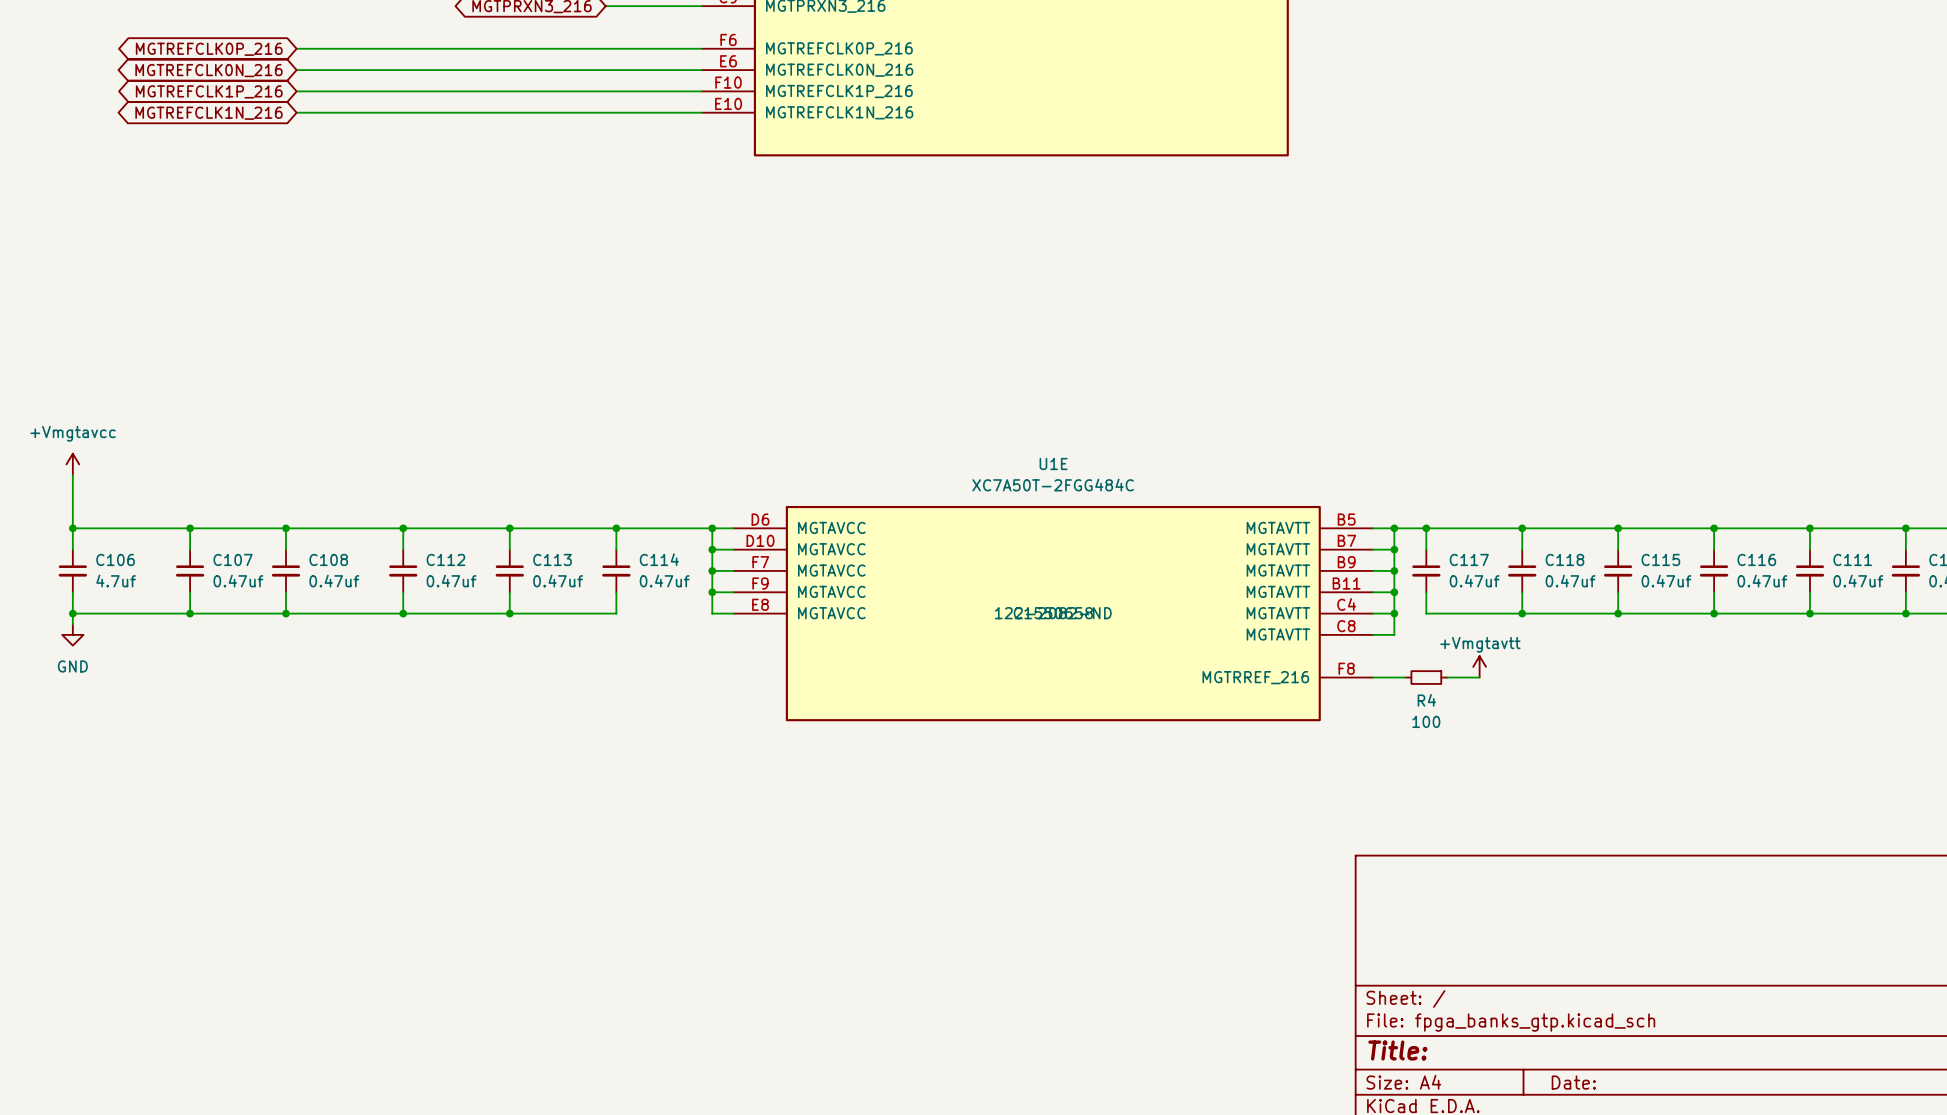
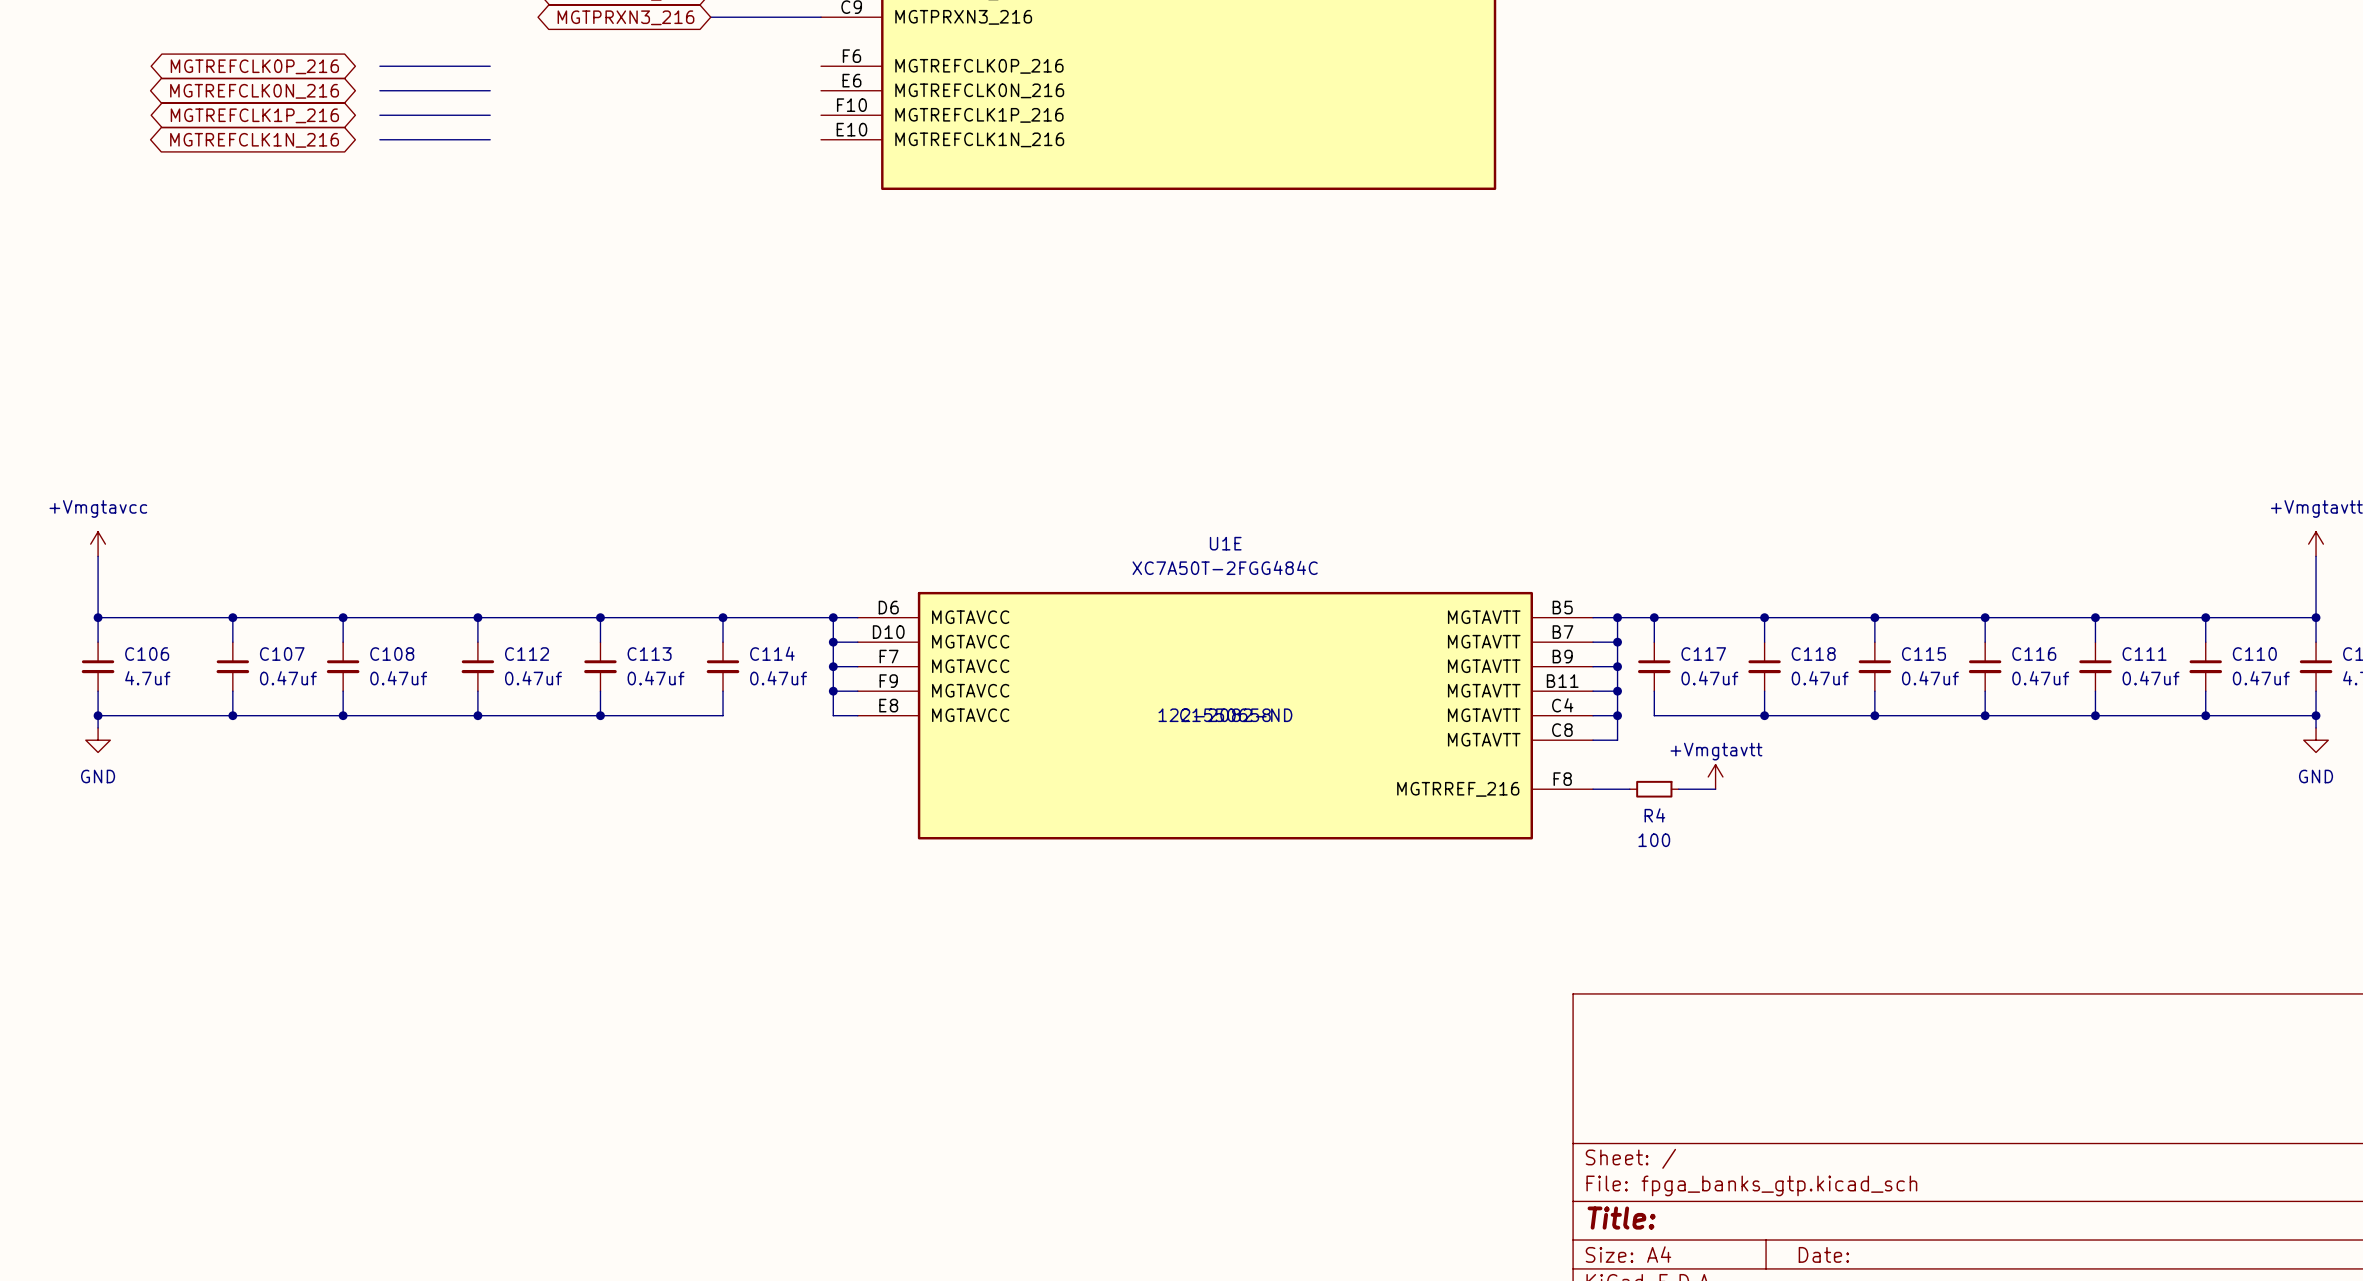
wire: (296, 48) (317, 48) -> none
wire: (413, 48) (701, 48) -> none
wire: (296, 70) (317, 70) -> none
wire: (413, 70) (701, 70) -> none
wire: (296, 91) (317, 91) -> none
wire: (413, 91) (701, 91) -> none
wire: (296, 112) (317, 112) -> none
wire: (413, 112) (701, 112) -> none

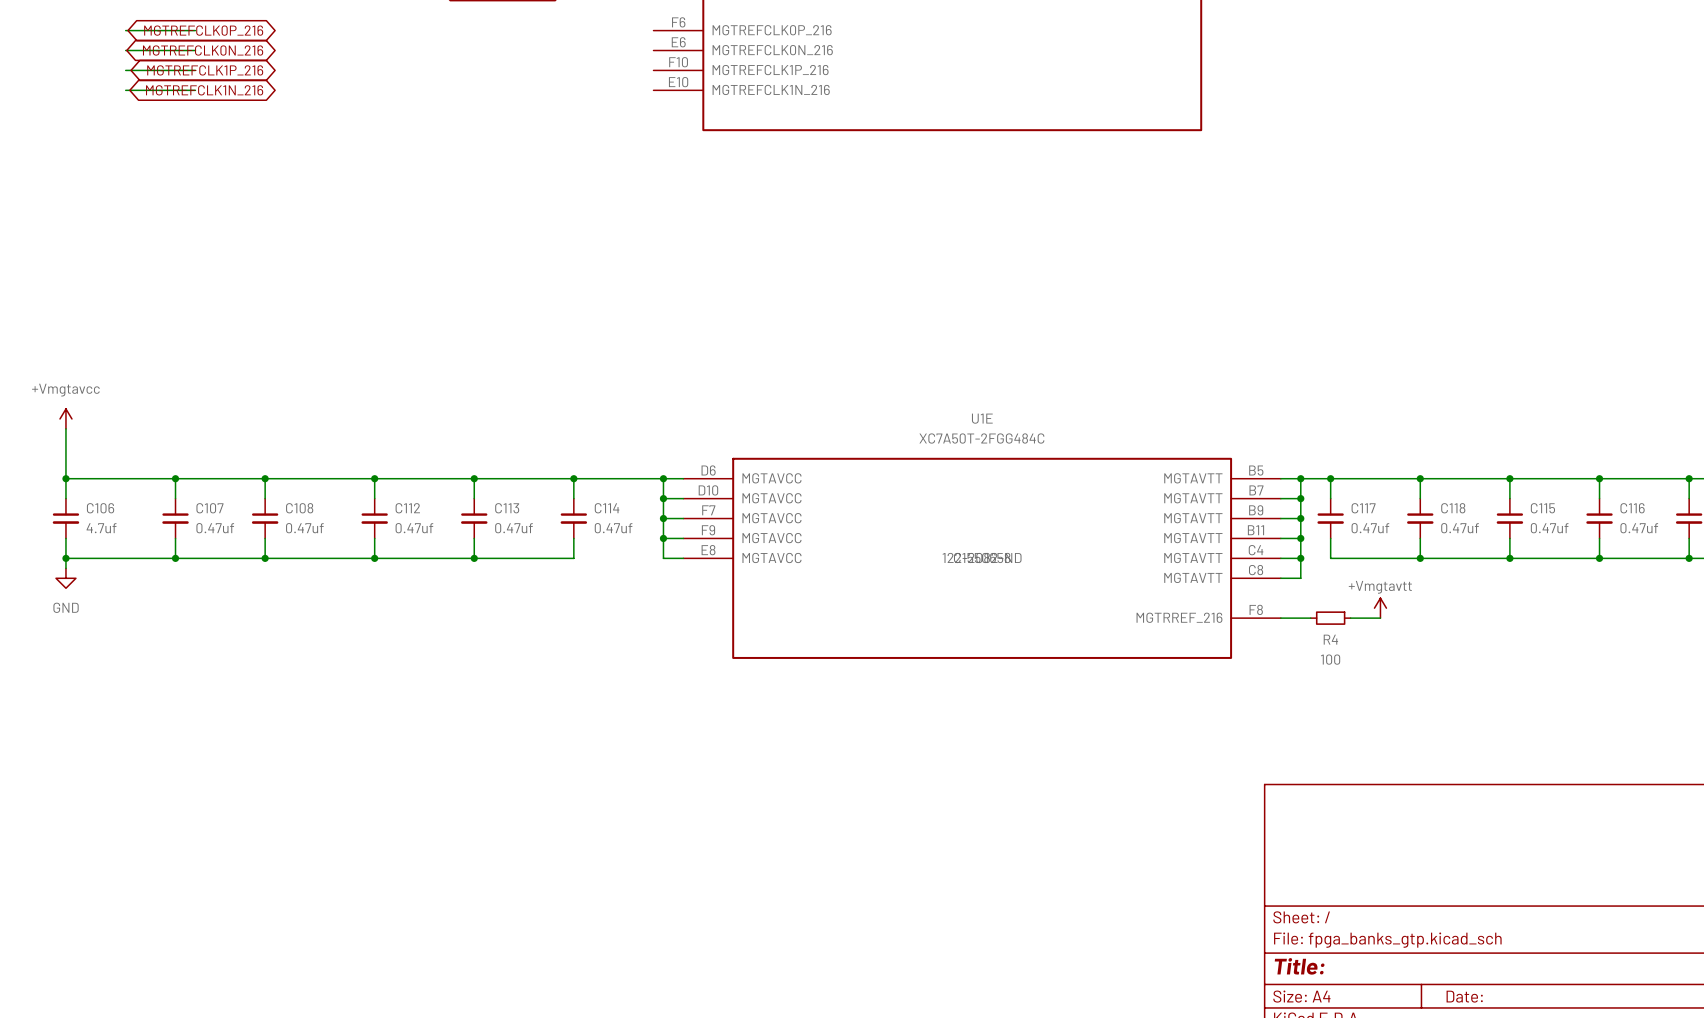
wire: none -> (125, 30) (195, 30)
wire: (379, 66) (490, 66) -> none
wire: none -> (125, 50) (195, 50)
wire: (379, 90) (490, 90) -> none
wire: none -> (125, 70) (195, 70)
wire: (379, 115) (490, 115) -> none
wire: none -> (125, 90) (195, 90)
wire: (379, 139) (490, 139) -> none

